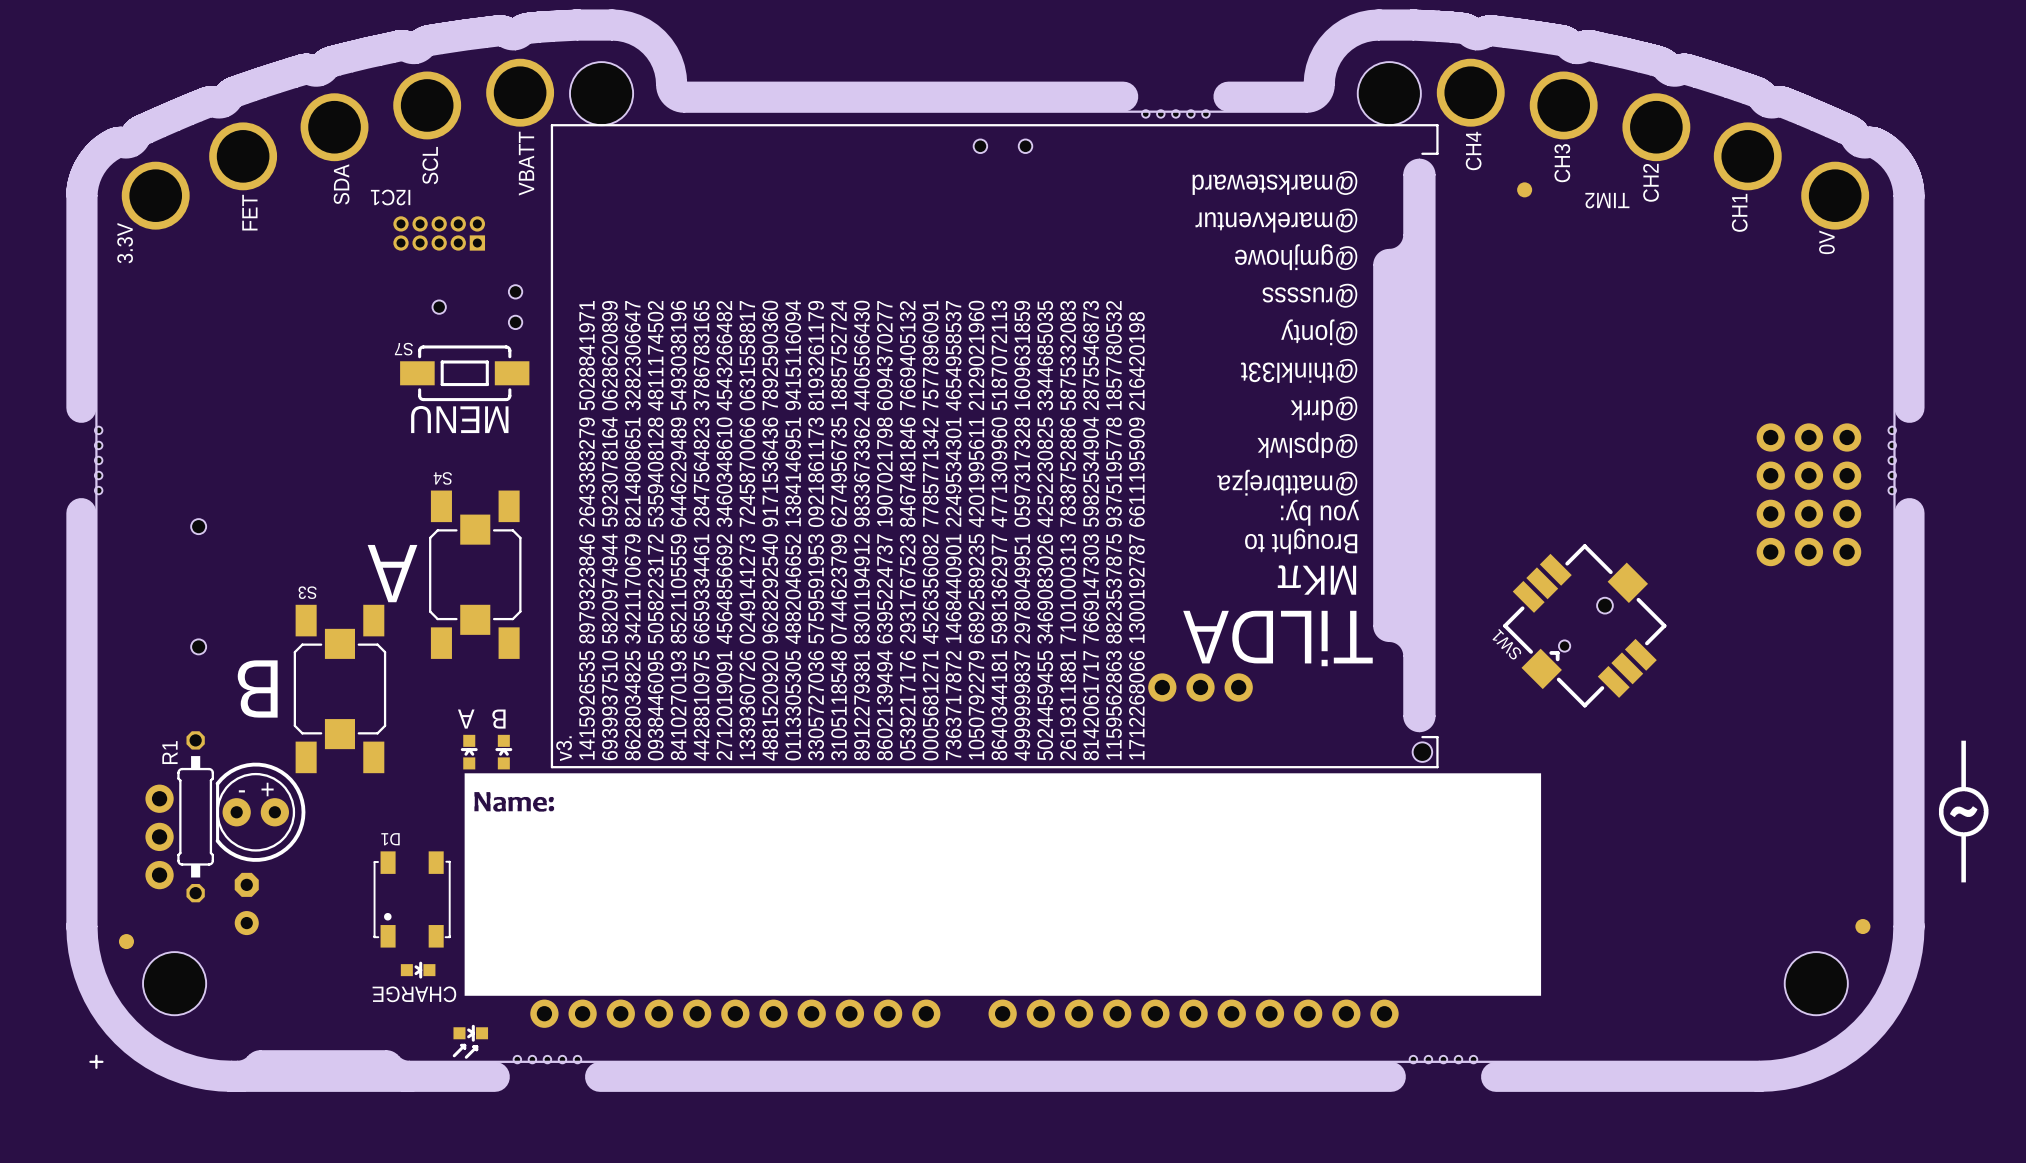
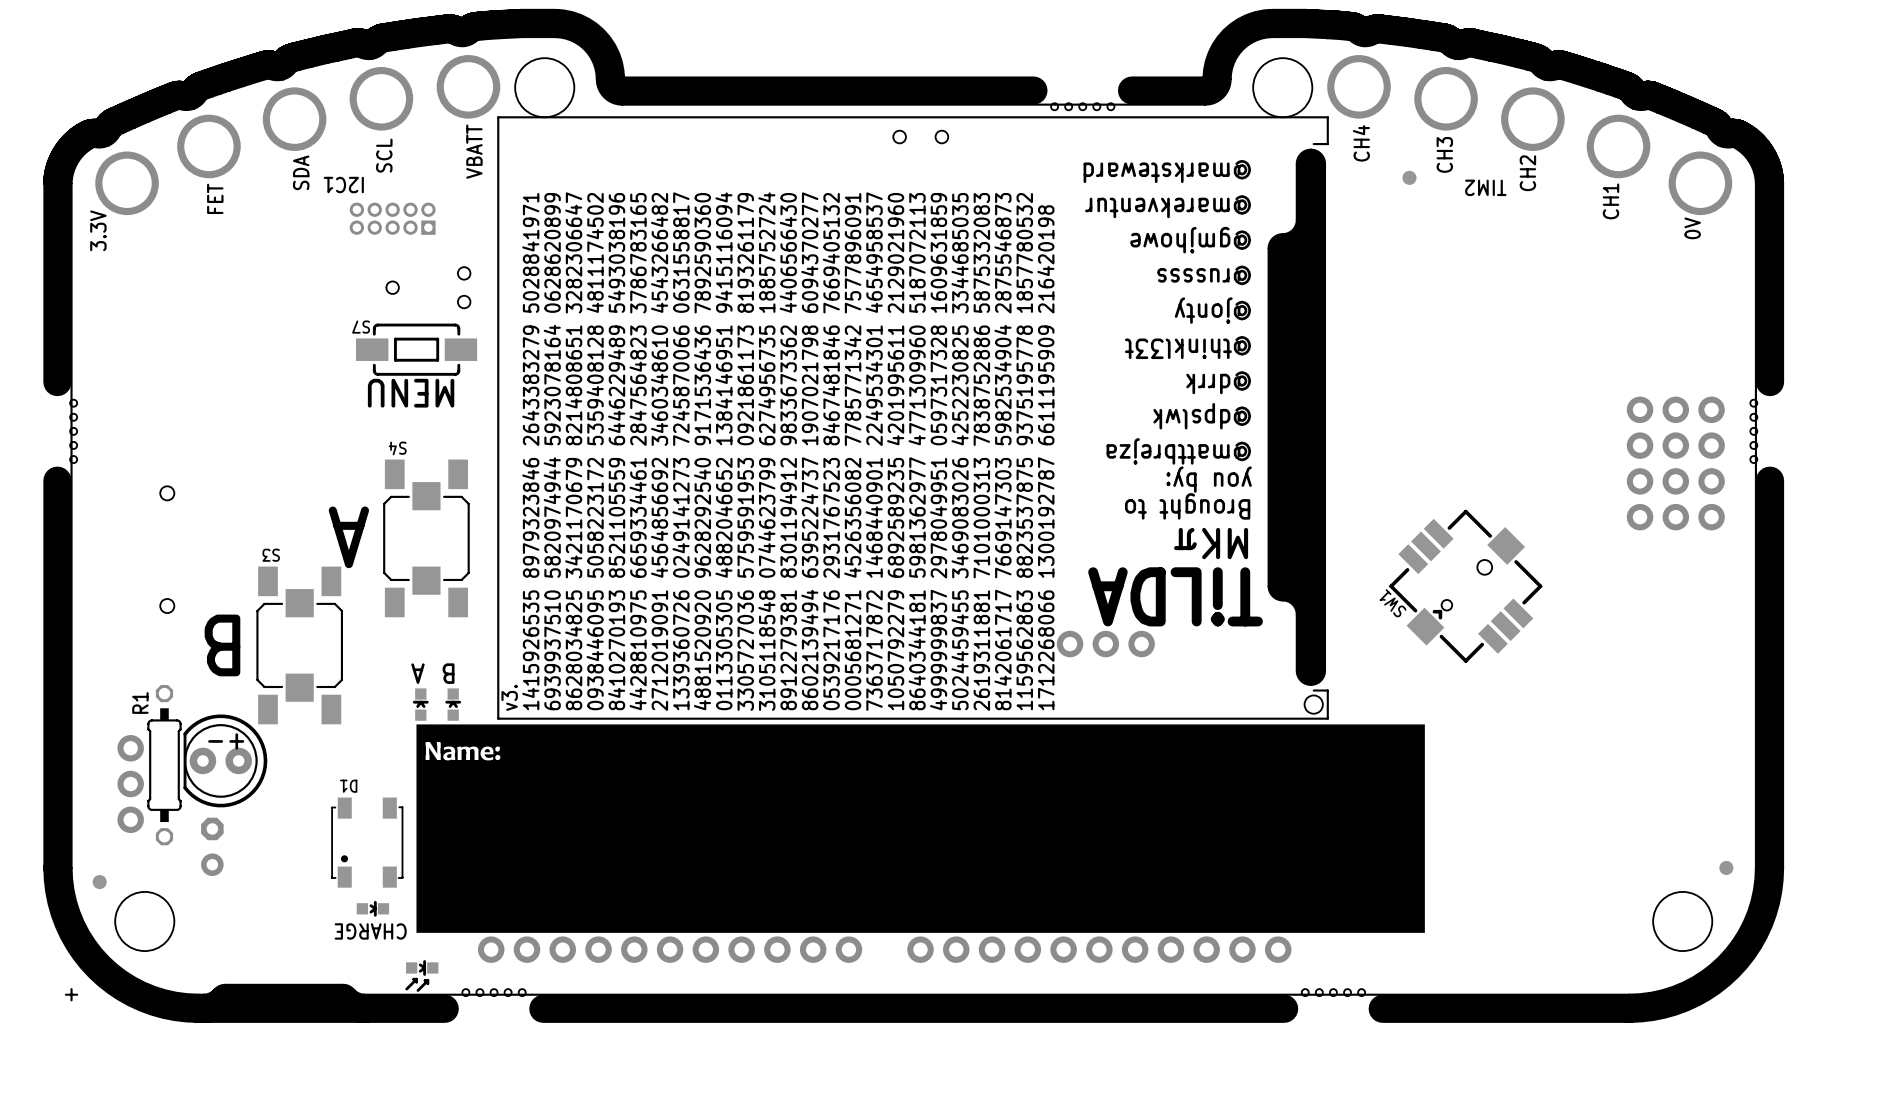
drawing: [1938, 740, 1989, 883] -> none

